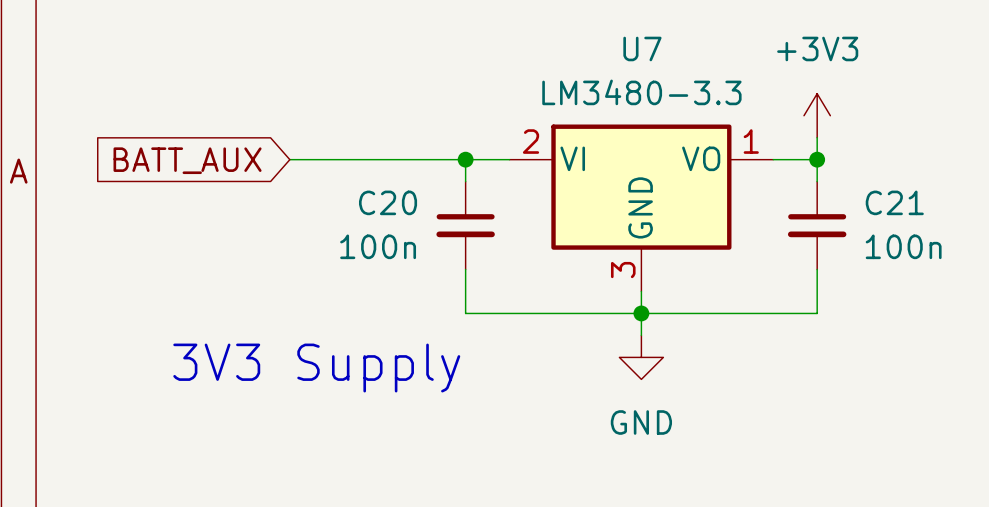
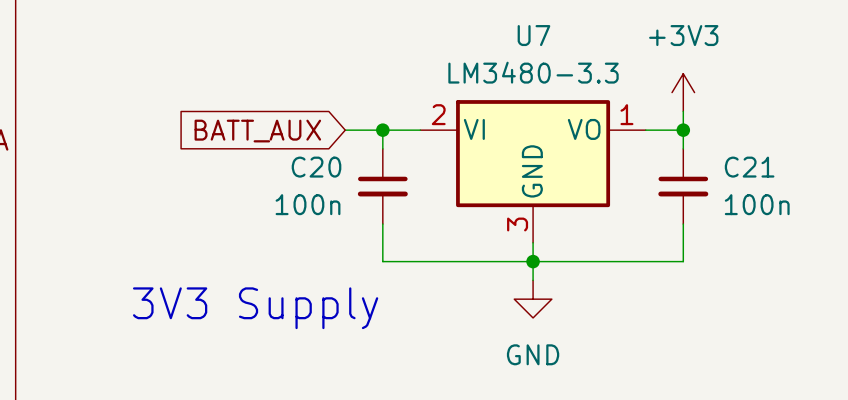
wire: (289, 159) (421, 159) -> none
global label position: BATT_AUX (187, 160) -> BATT_AUX (257, 131)

